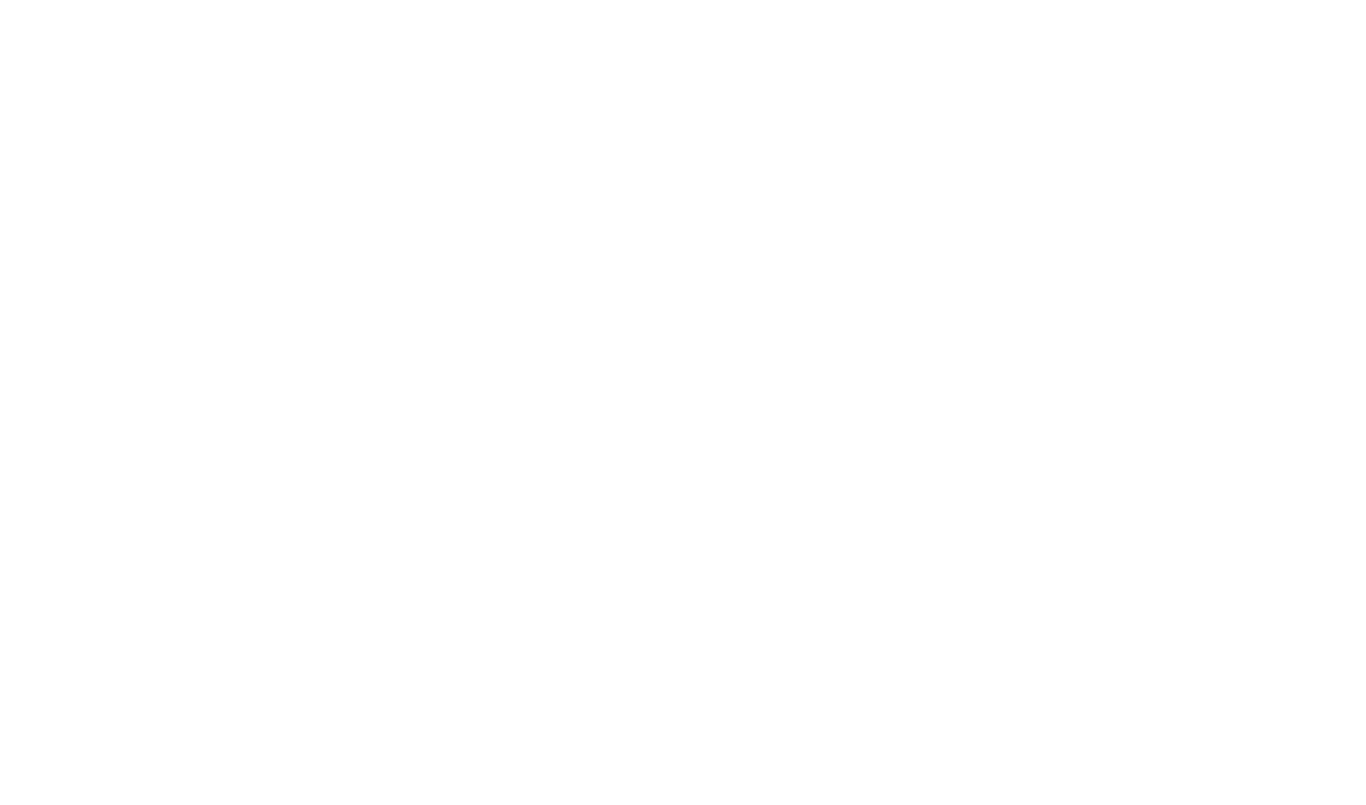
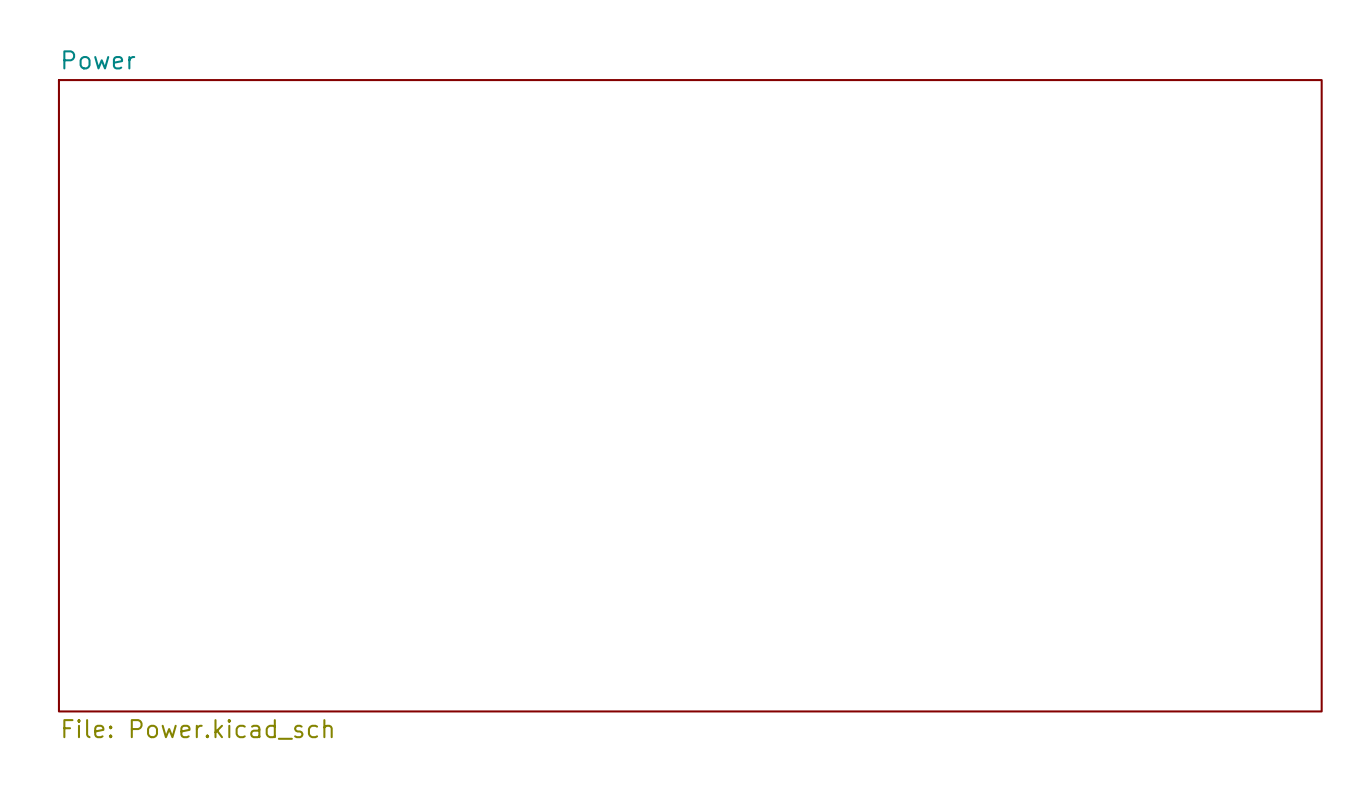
sheet Power: none -> File: Power.kicad_sch (690, 395)

